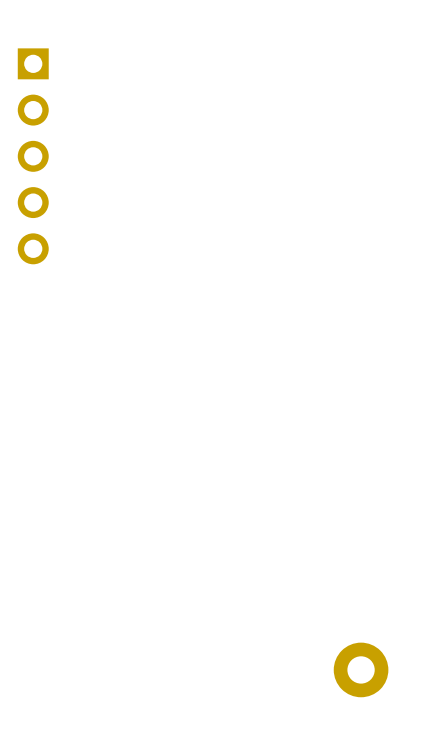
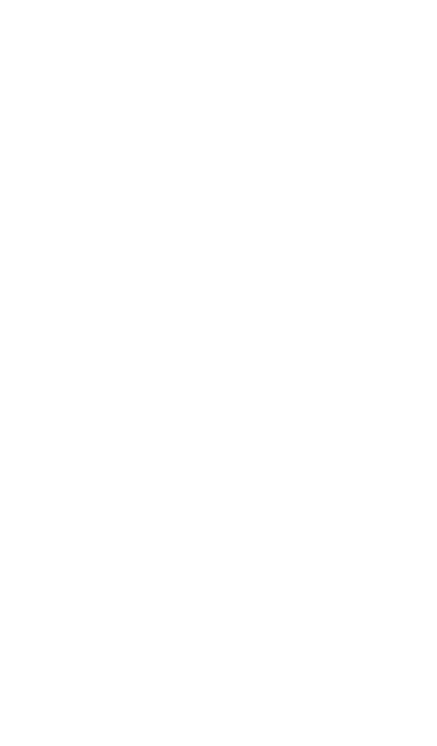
part: (33, 156) -> none
part: (361, 669) -> none

